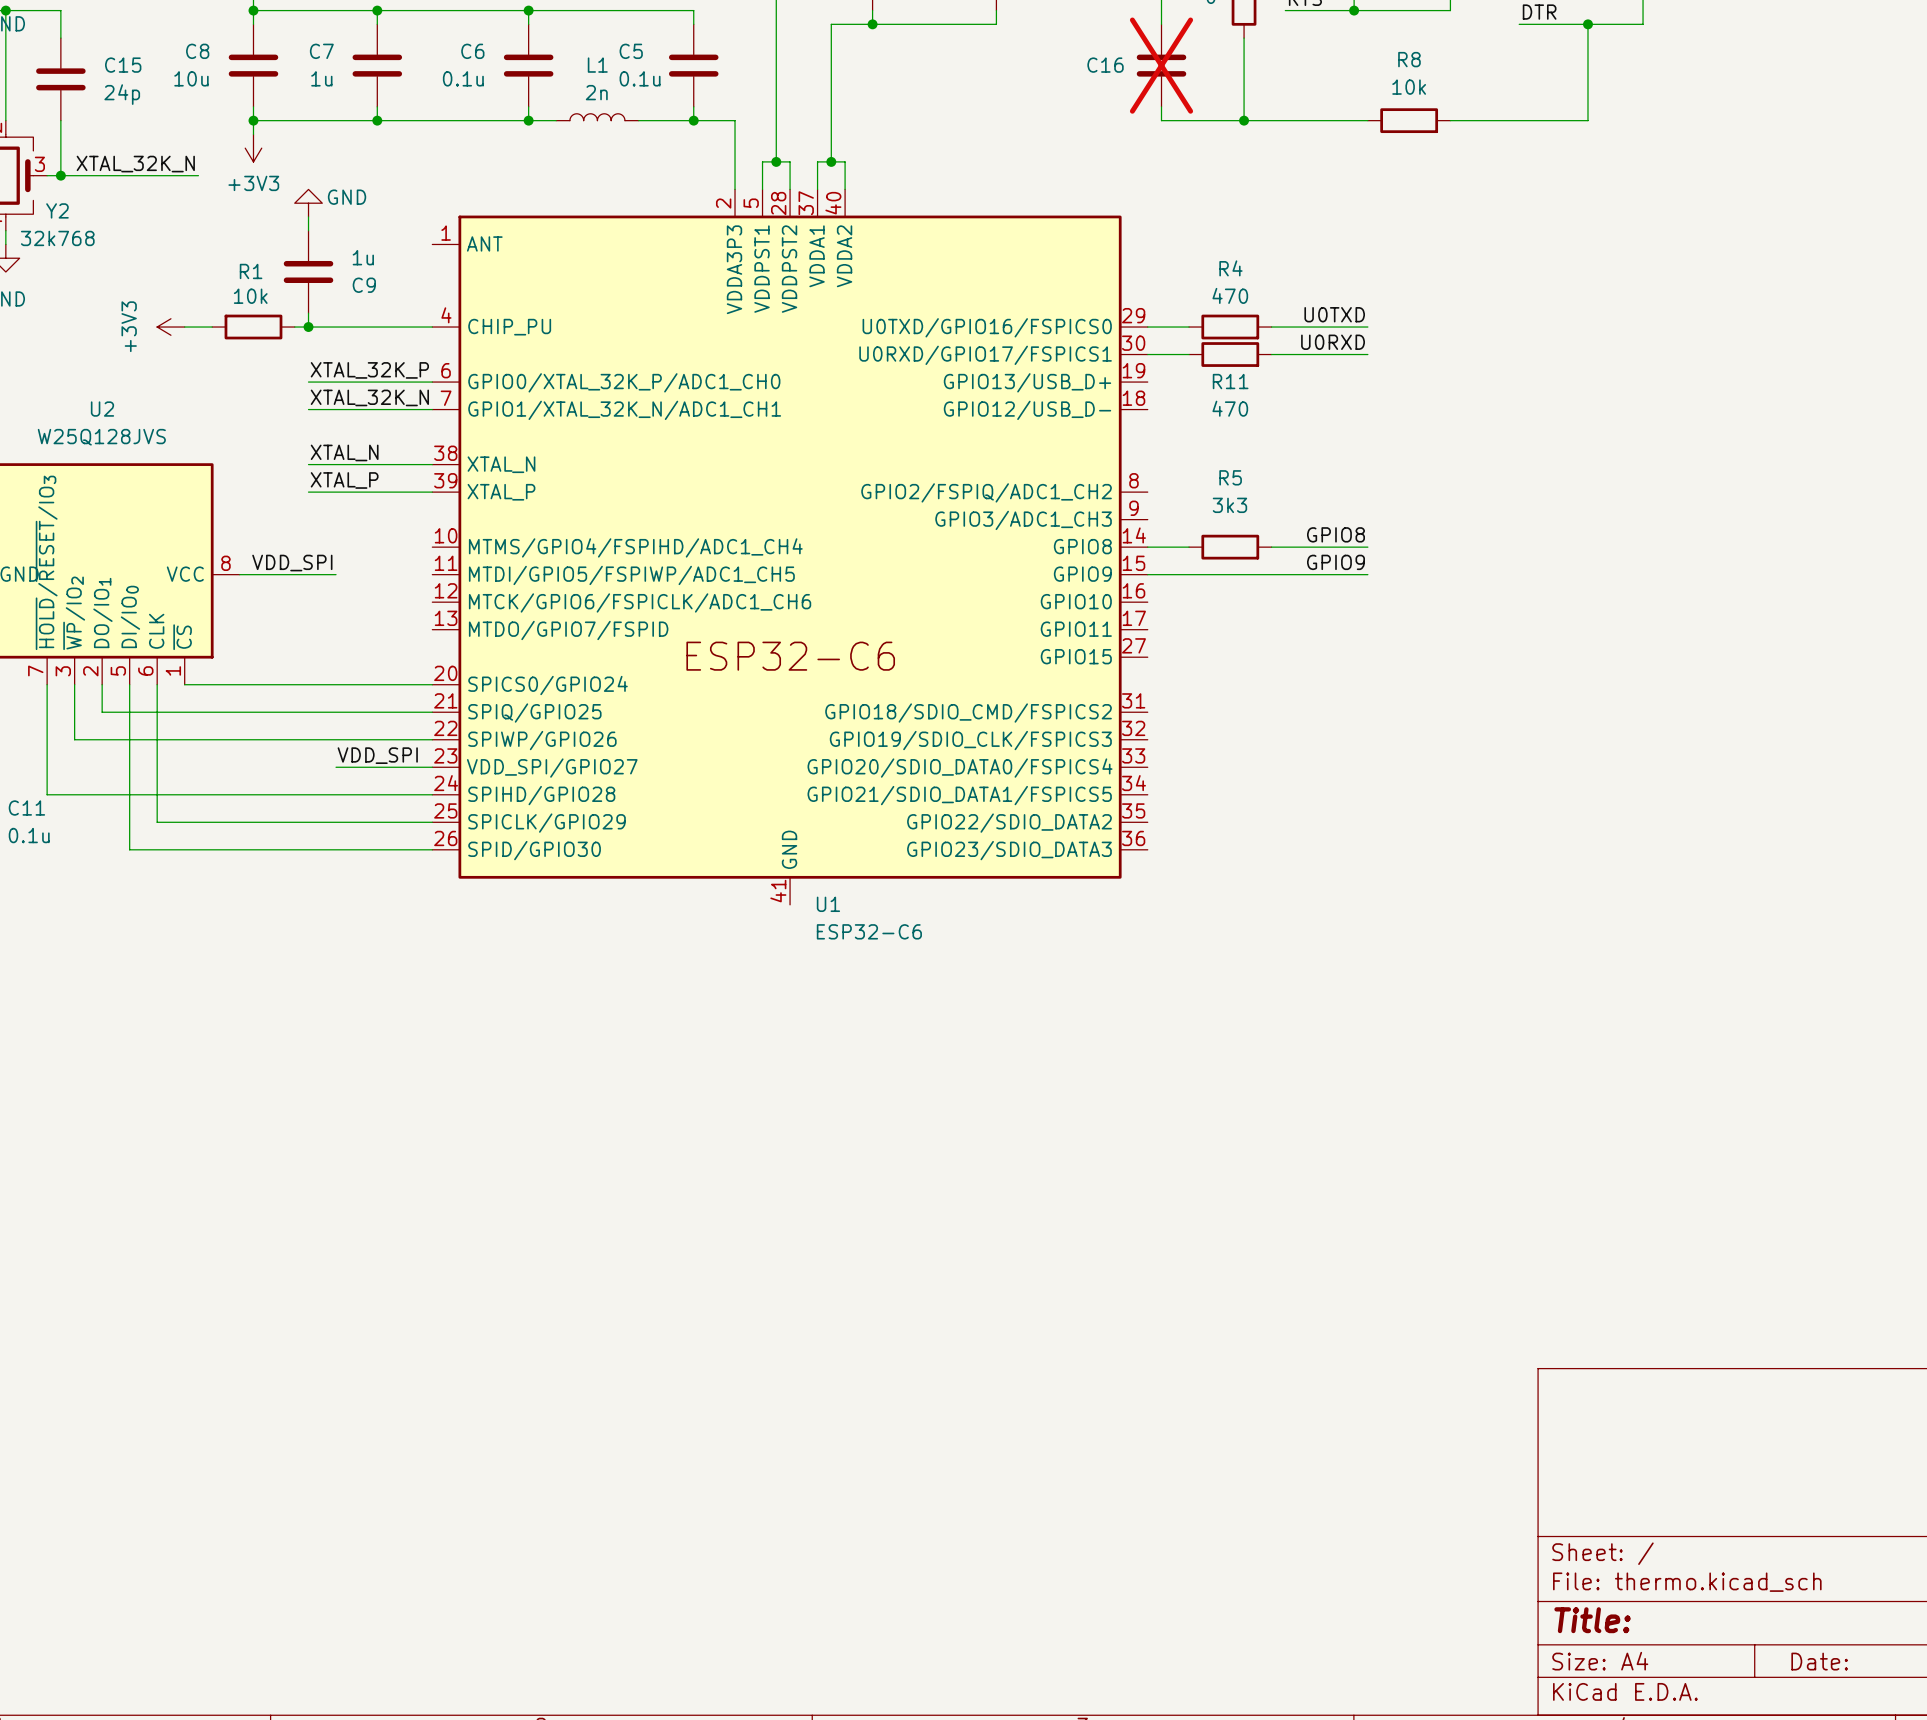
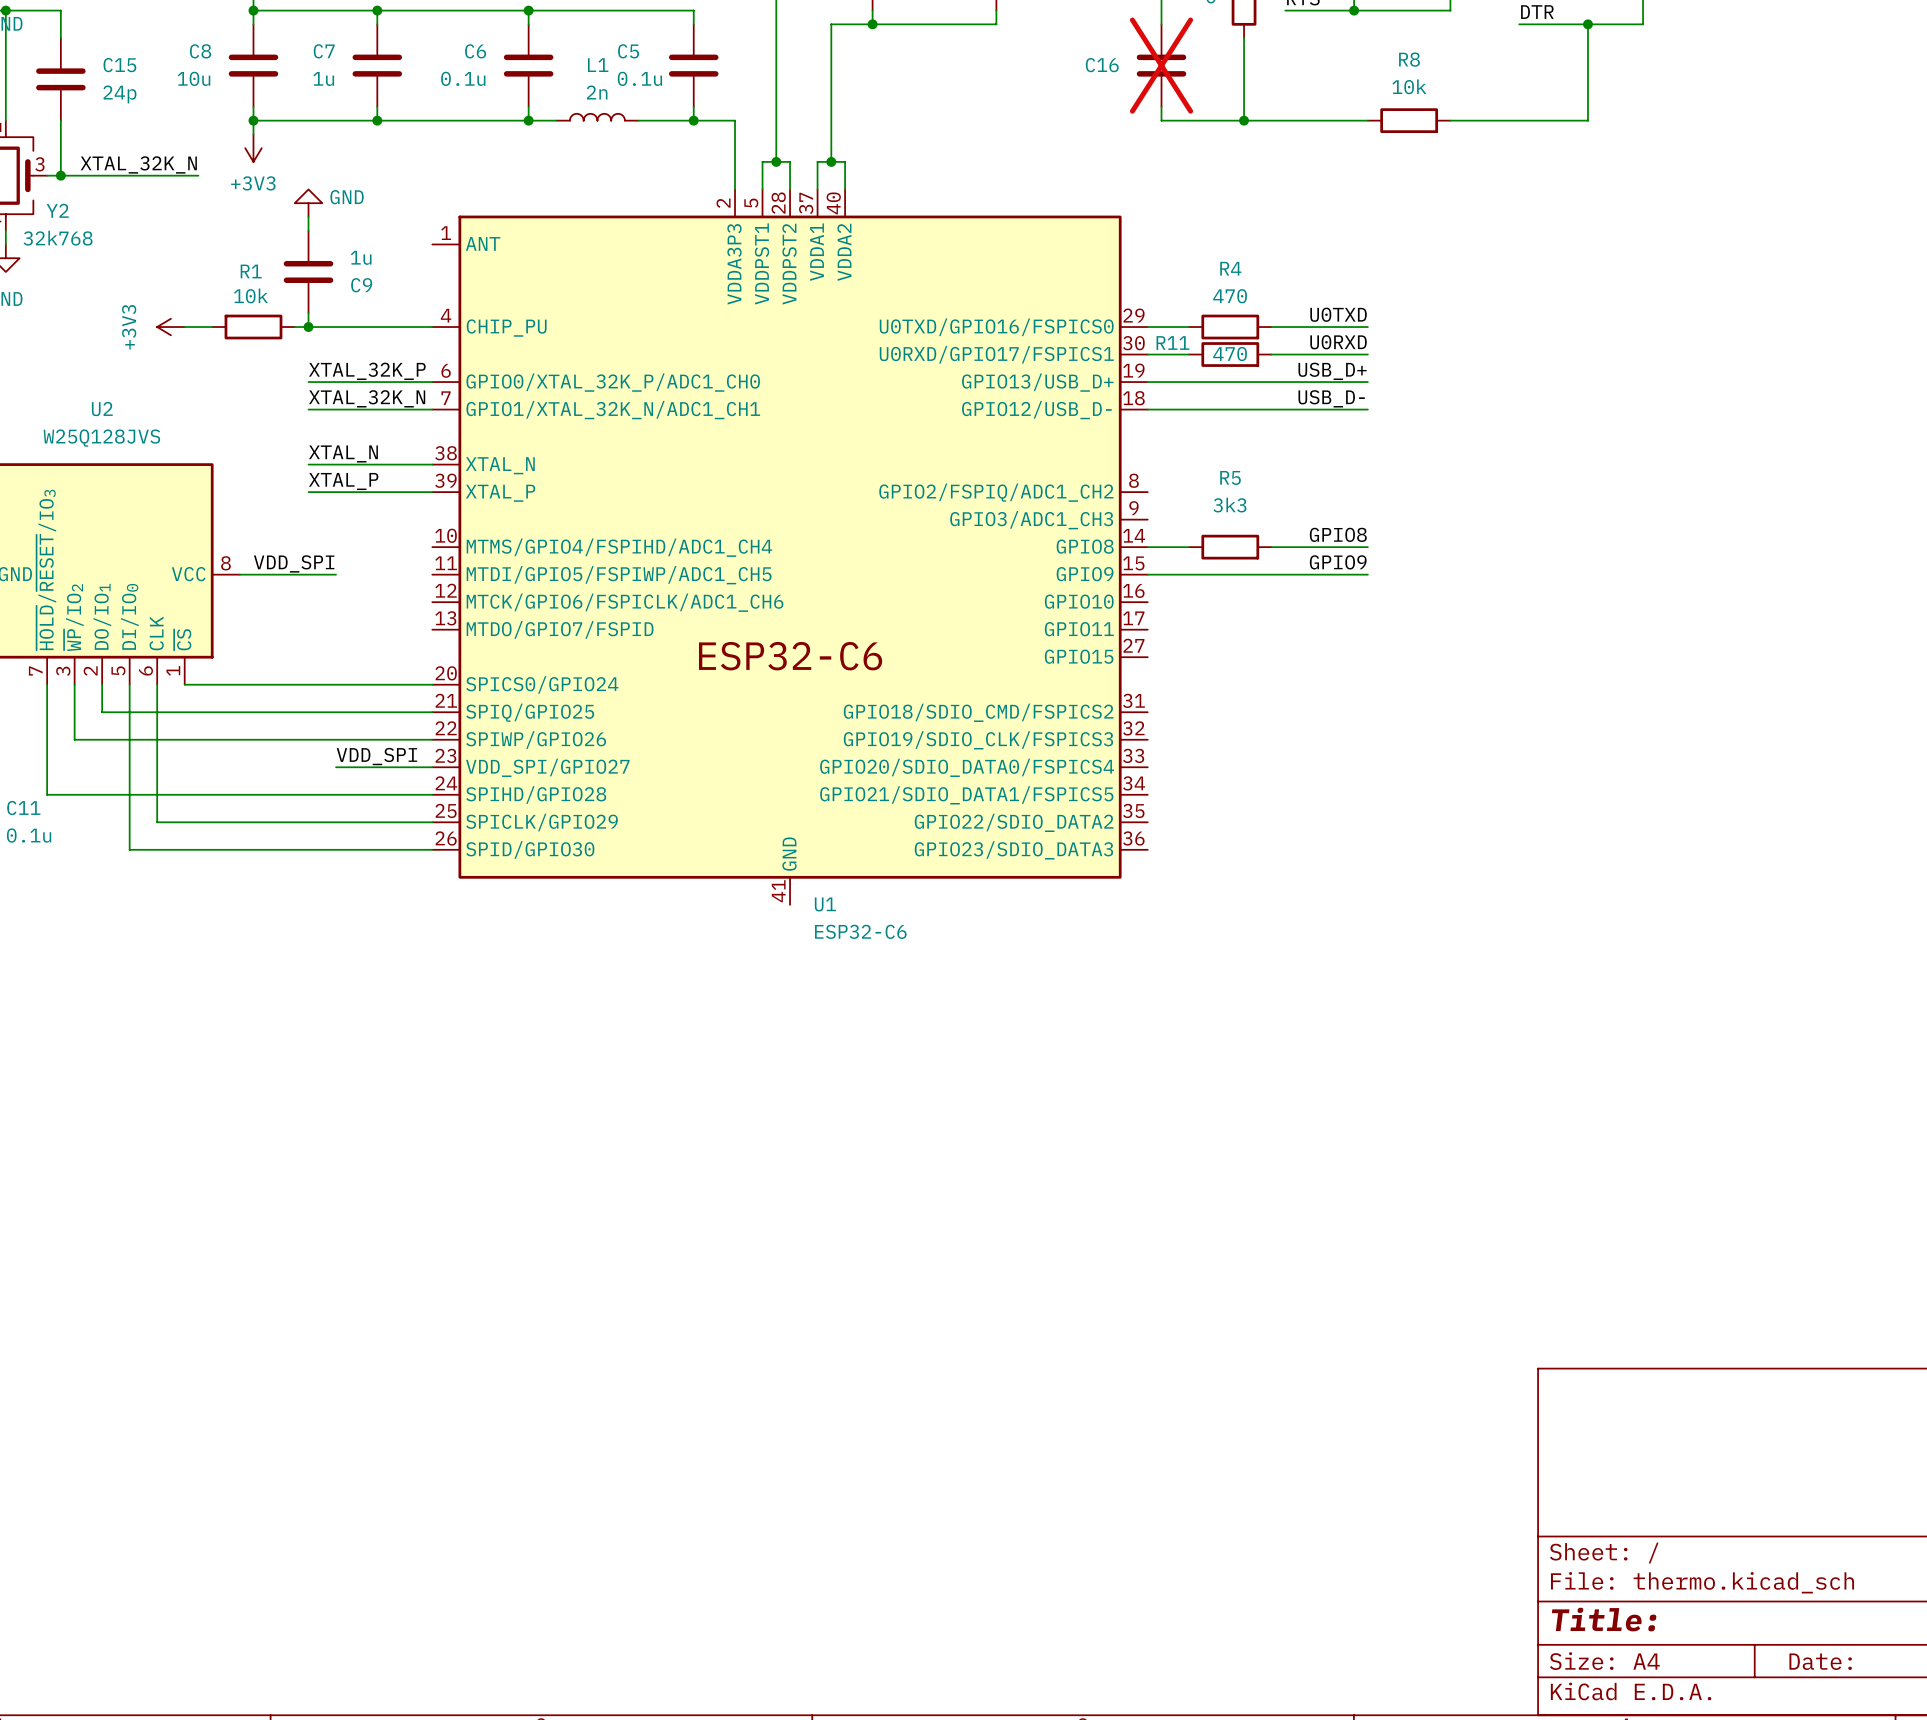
label: none -> USB_D+ (1332, 371)
R11 name position: R11 (1230, 381) -> R11 (1172, 343)
wire: none -> (1147, 382) (1367, 382)
label: none -> USB_D- (1331, 398)
R11 value position: 470 (1230, 408) -> 470 (1230, 354)
wire: none -> (1147, 409) (1367, 409)

